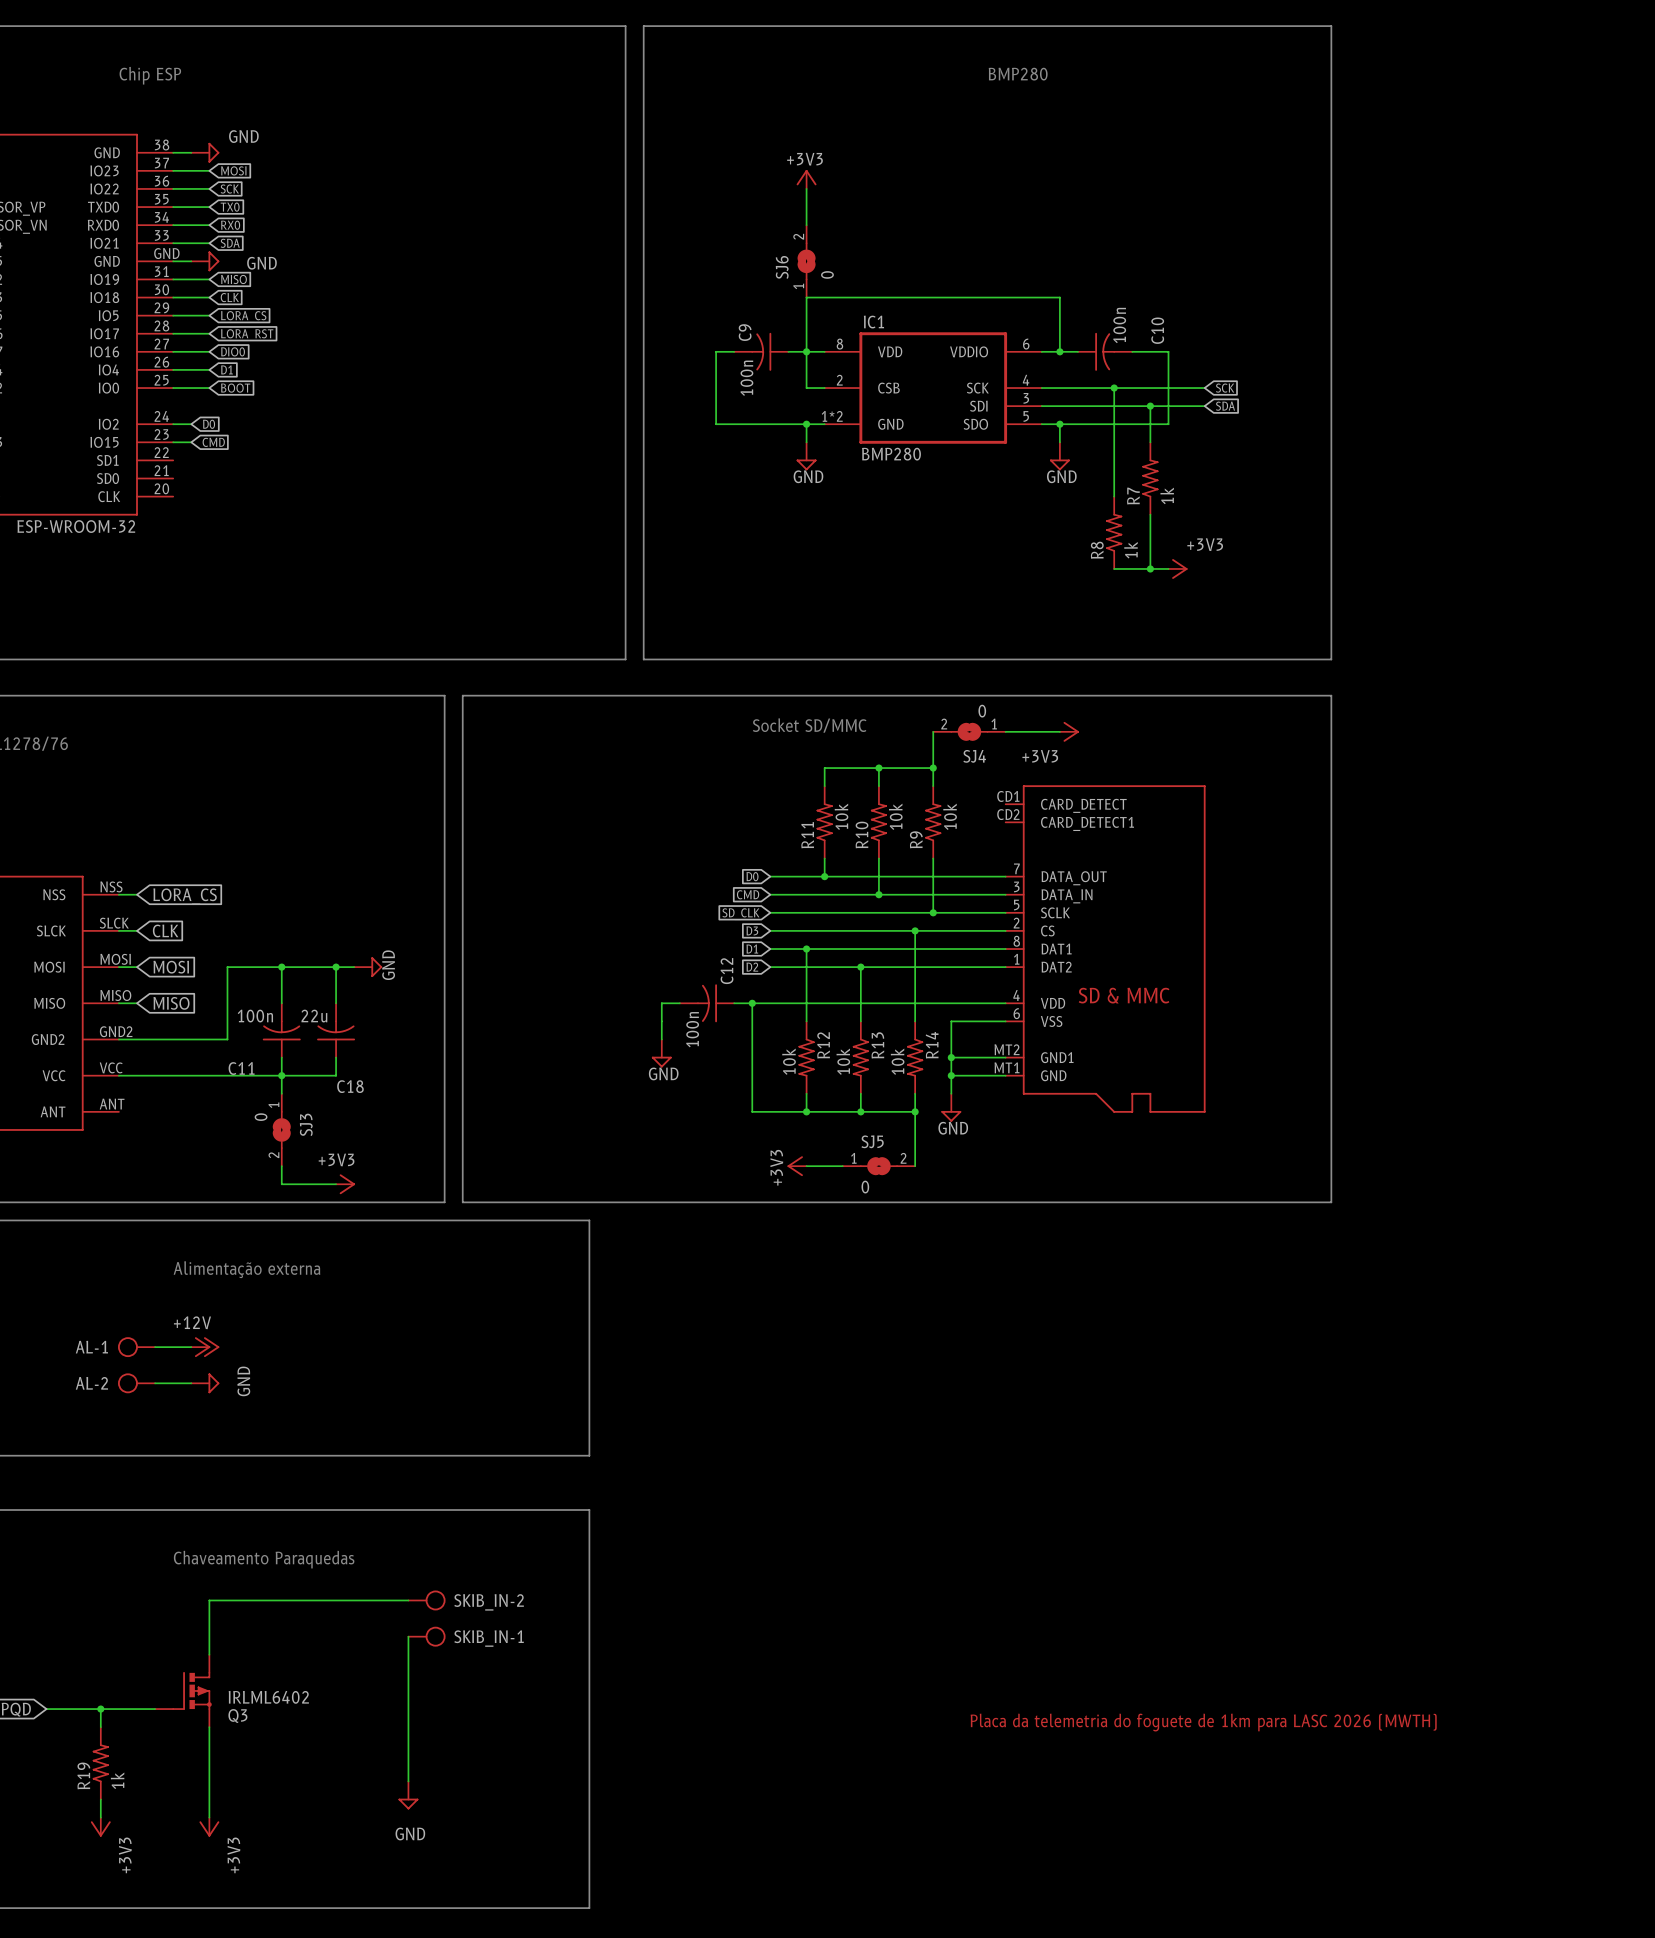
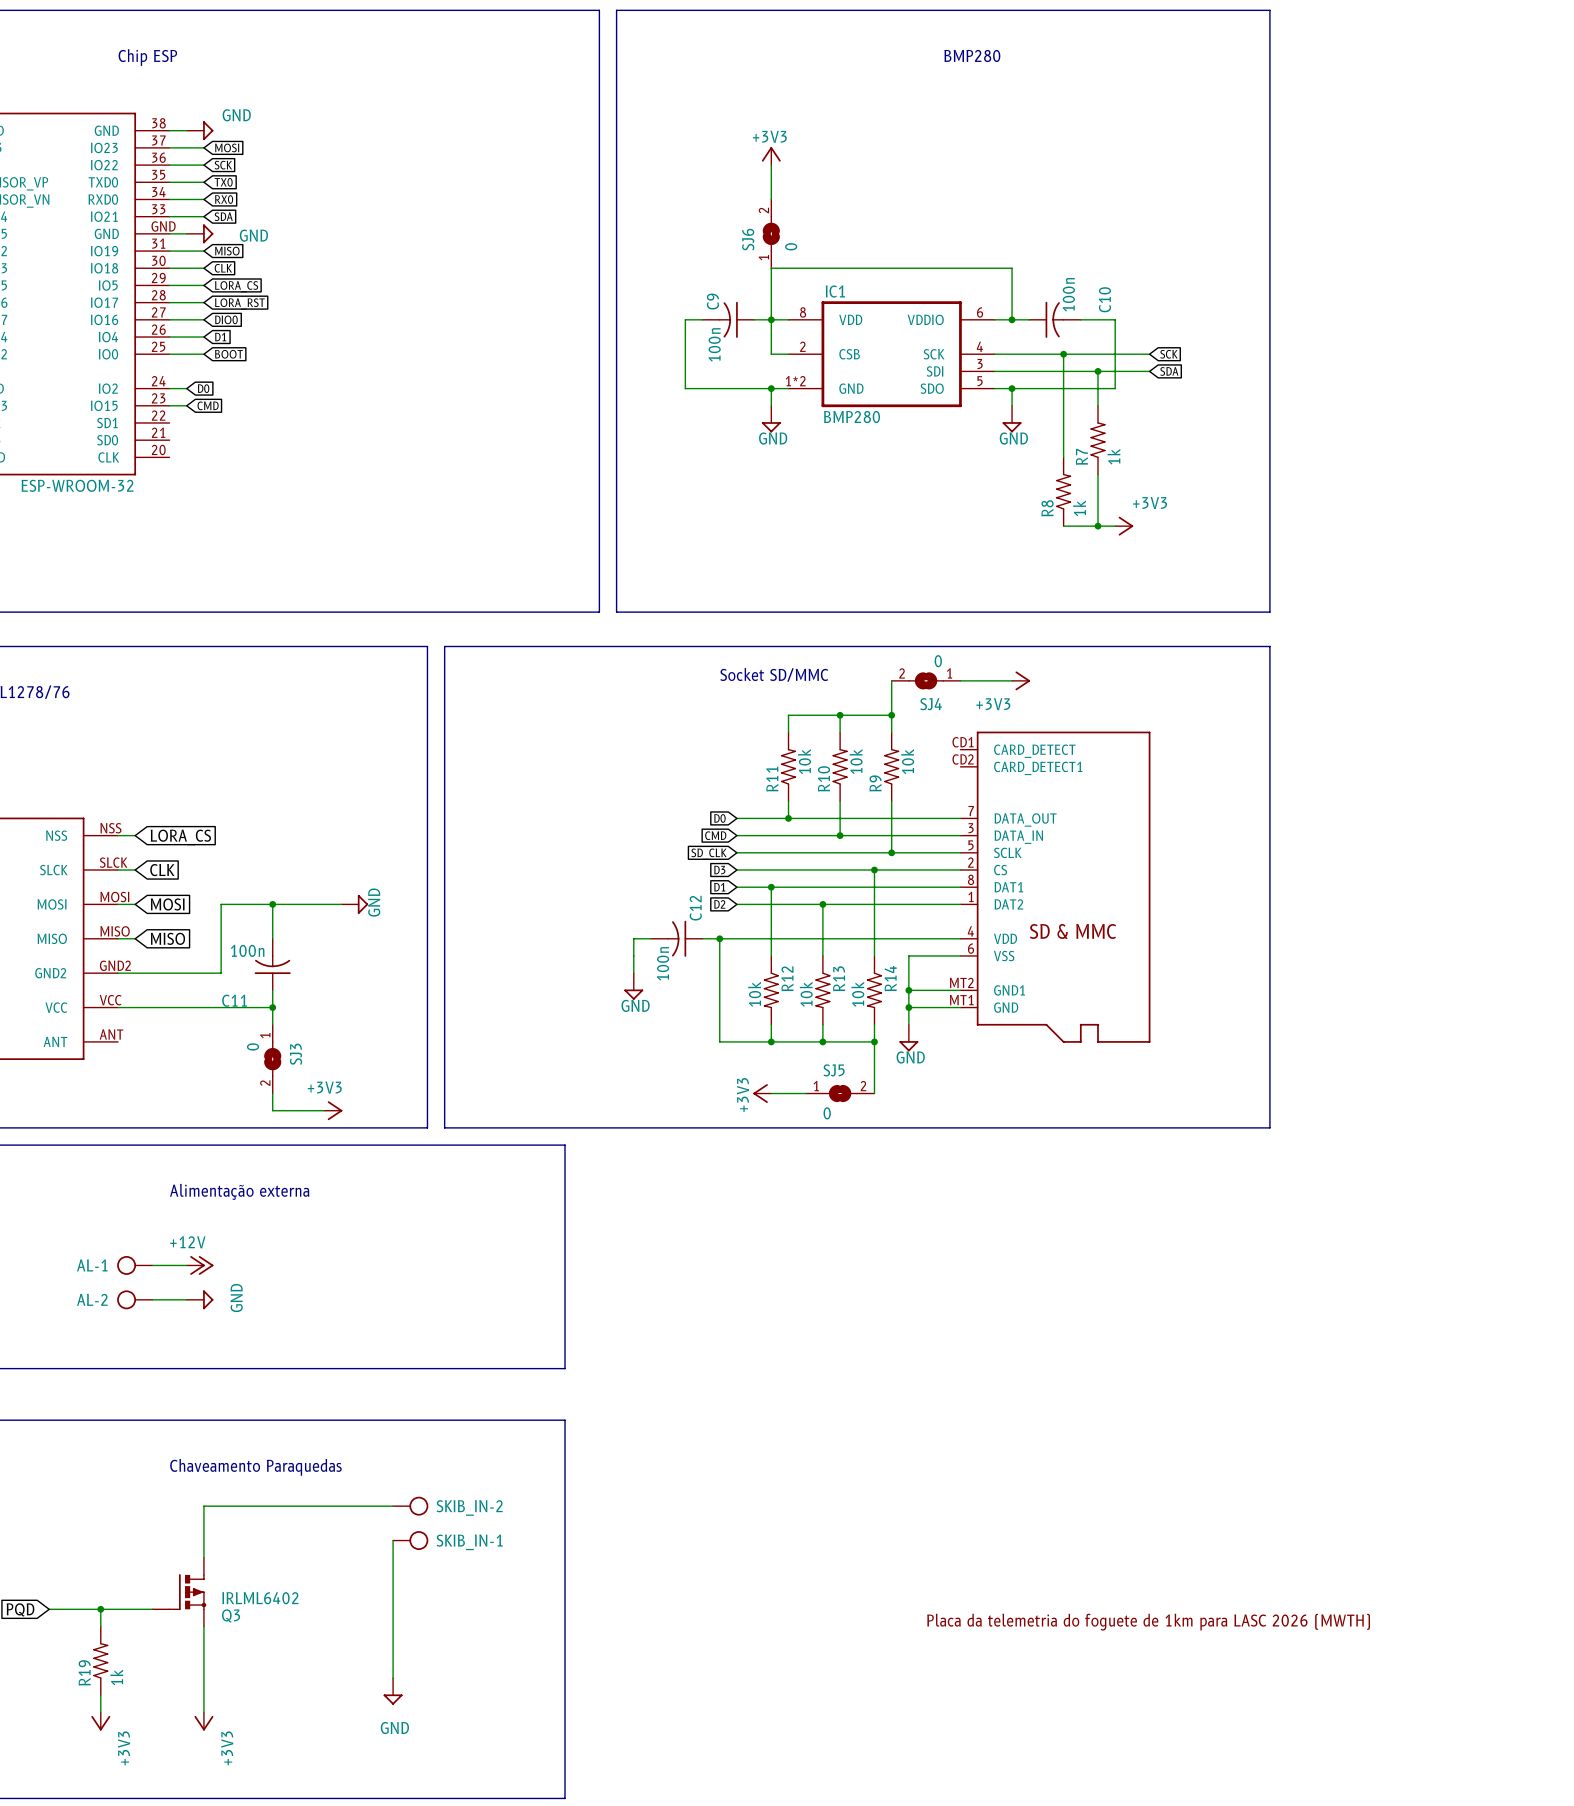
wire: (336, 967) (336, 1003) -> none
junction: (336, 967) -> none
C18: 22u (336, 1030) -> none
wire: (336, 1057) (336, 1075) (281, 1075) -> none

